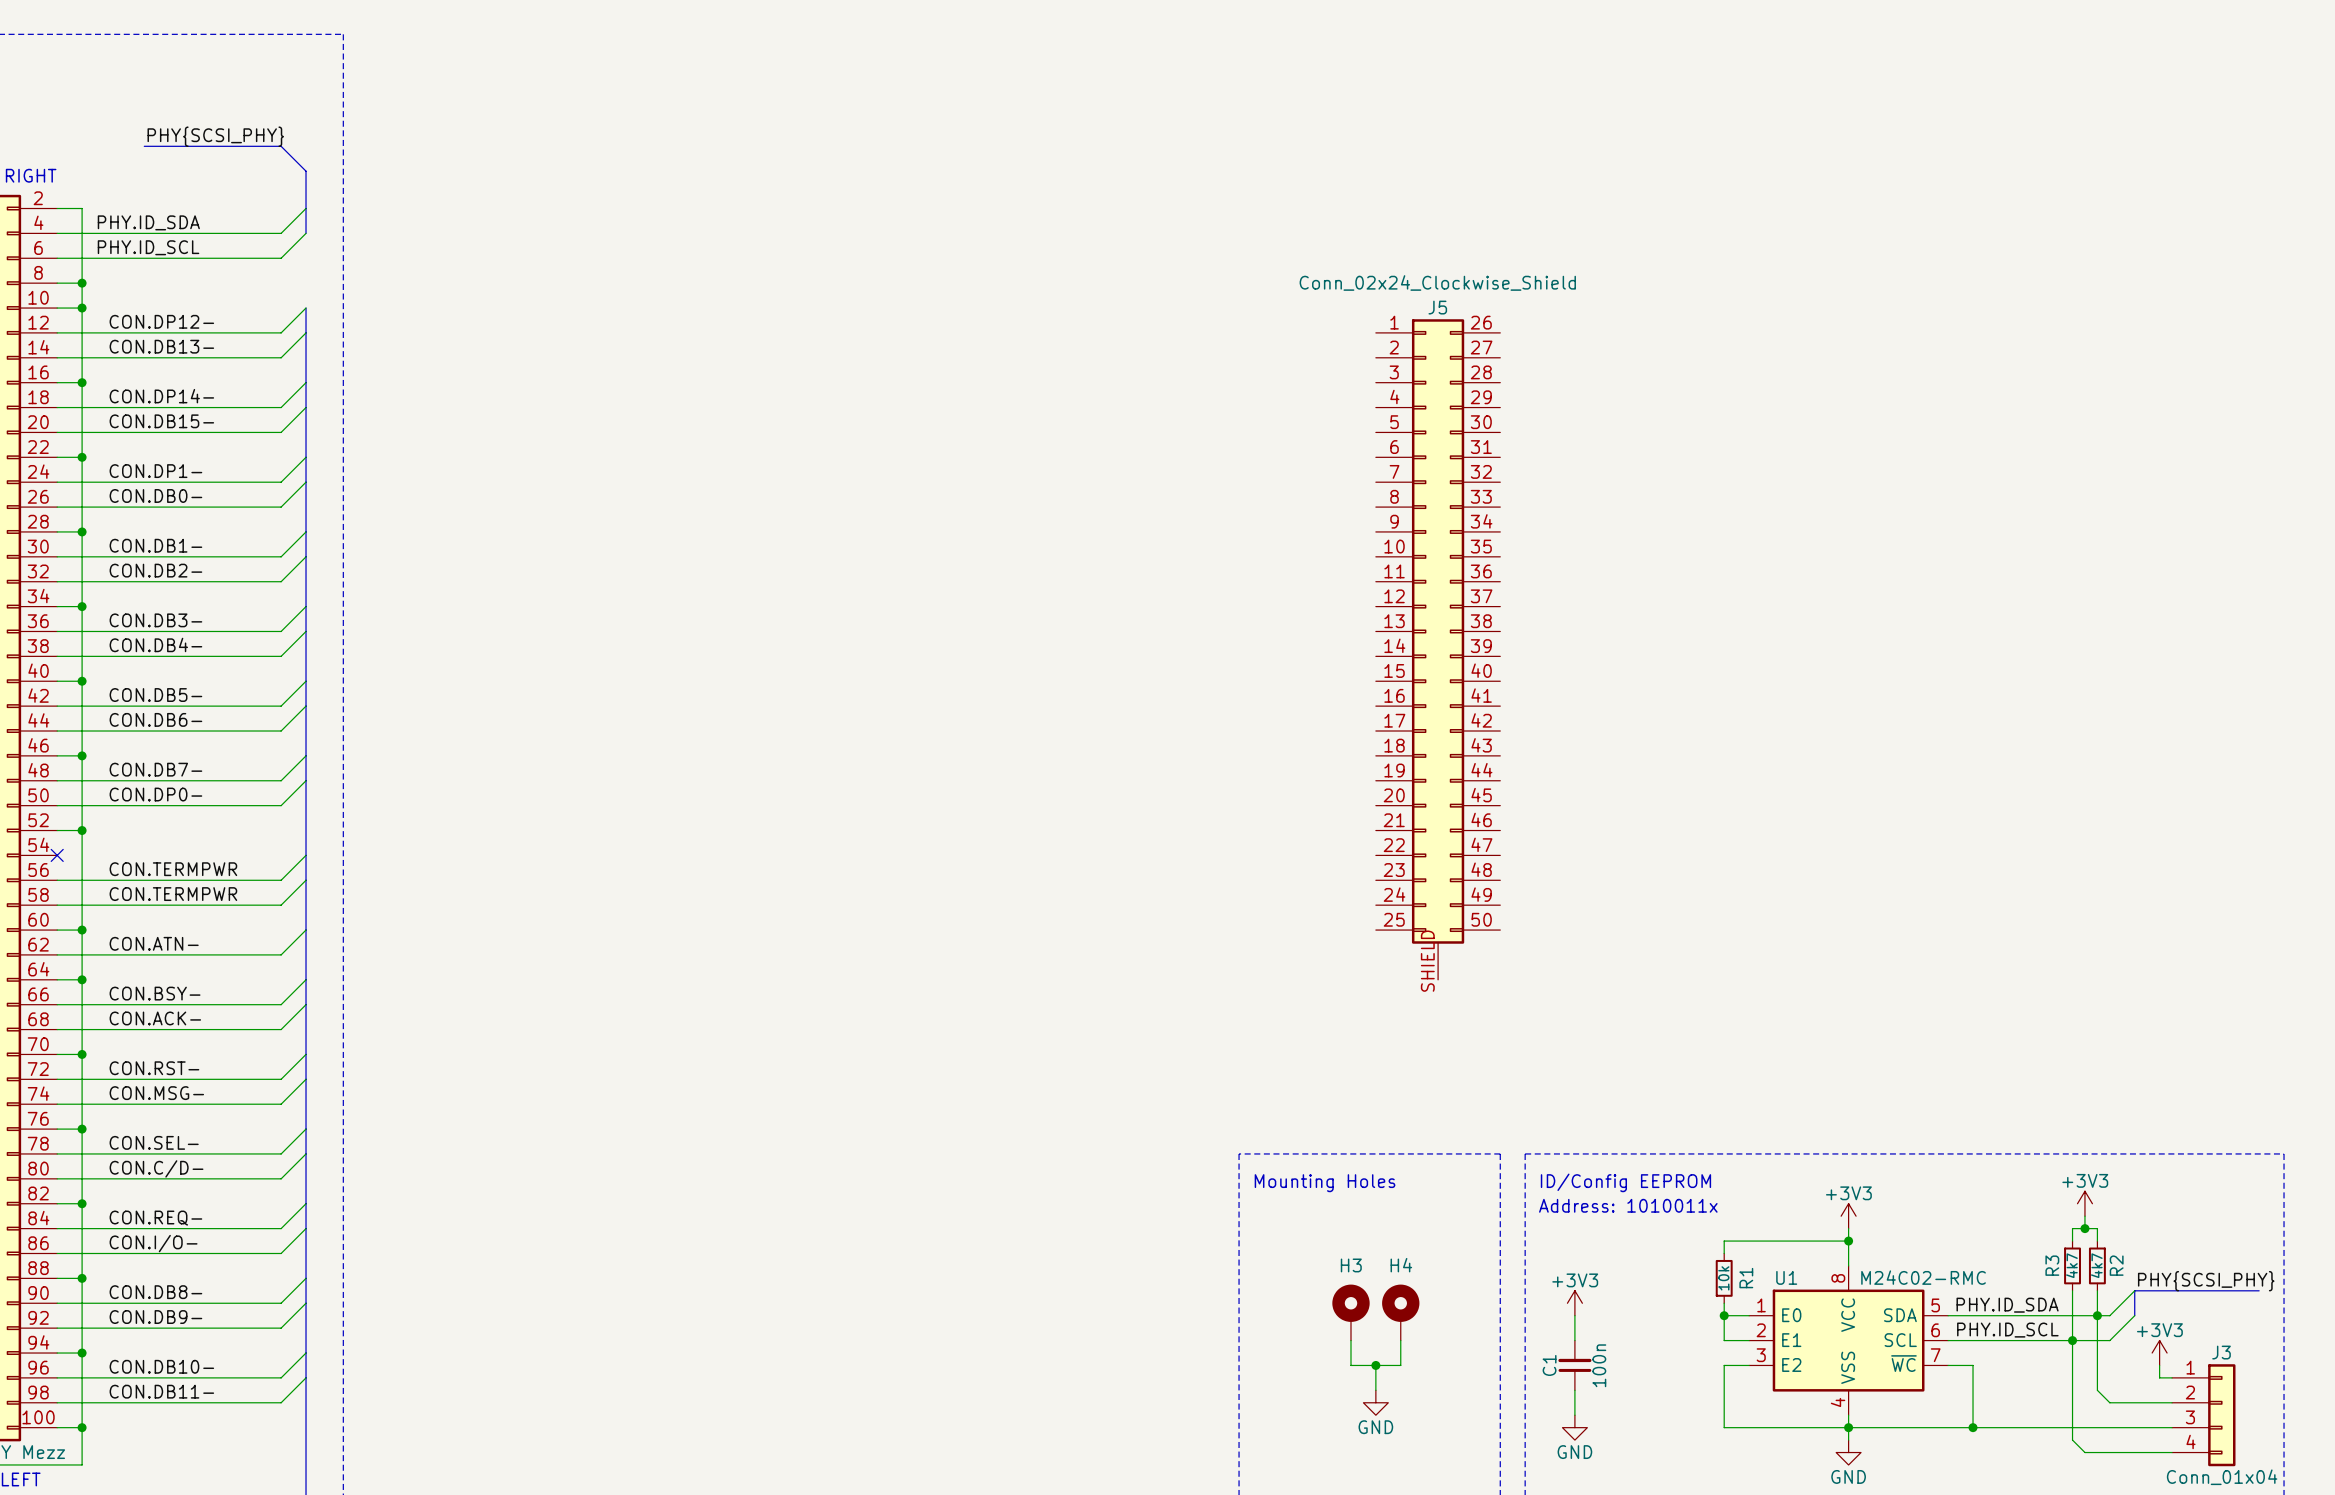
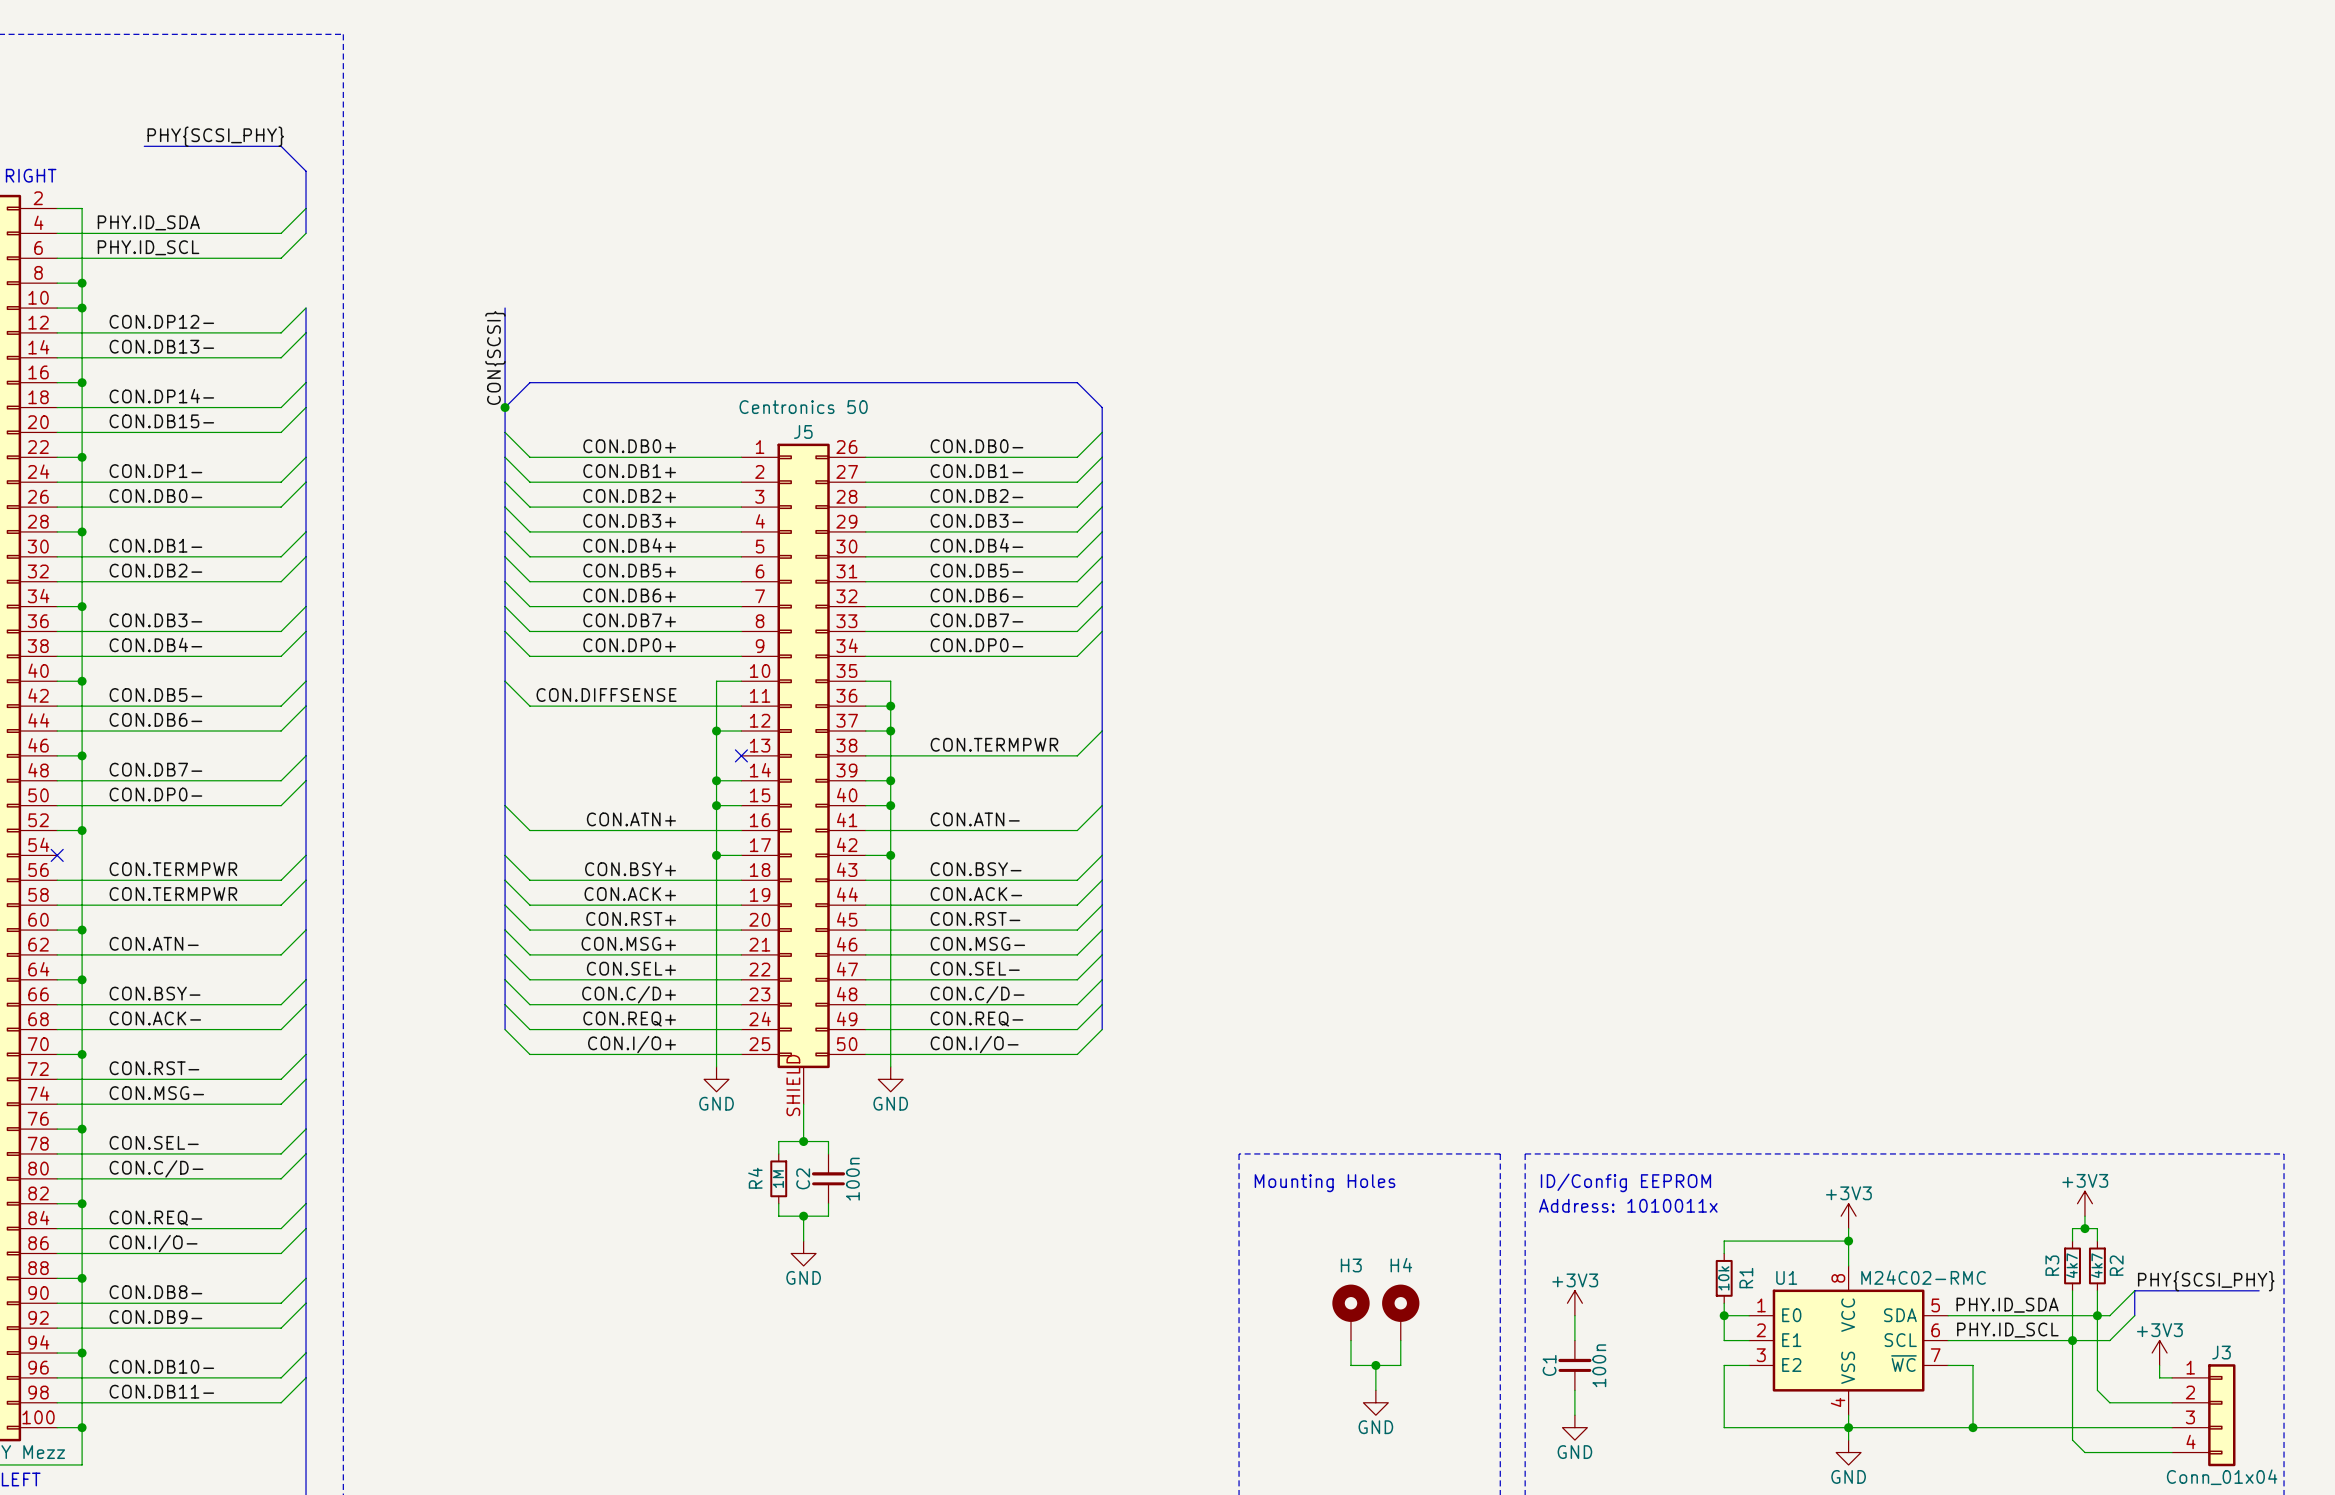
J5 value: Conn_02x24_Clockwise_Shield (1437, 282) -> Centronics 50 (803, 407)
bus: none -> (505, 308) (505, 1029)
label: none -> CON{SCSI} (495, 357)
bus: none -> (505, 407) (529, 382) (1077, 382) (1102, 407) (1102, 1029)
junction: none -> (505, 407)
wire: none -> (505, 432) (529, 457) (741, 457)
wire: none -> (1102, 432) (1077, 457) (865, 457)
label: none -> CON.DB0+ (629, 446)
label: none -> CON.DB0- (976, 446)
wire: none -> (505, 457) (529, 482) (741, 482)
wire: none -> (1102, 457) (1077, 482) (865, 482)
label: none -> CON.DB1+ (629, 471)
label: none -> CON.DB1- (976, 471)
wire: none -> (505, 482) (529, 507) (741, 507)
wire: none -> (1102, 482) (1077, 507) (865, 507)
label: none -> CON.DB2+ (629, 495)
label: none -> CON.DB2- (976, 495)
wire: none -> (505, 507) (529, 531) (741, 531)
wire: none -> (1102, 507) (1077, 531) (865, 531)
label: none -> CON.DB3+ (629, 520)
label: none -> CON.DB3- (976, 520)
wire: none -> (505, 531) (529, 556) (741, 556)
wire: none -> (1102, 531) (1077, 556) (865, 556)
label: none -> CON.DB4+ (629, 545)
label: none -> CON.DB4- (976, 545)
wire: none -> (505, 556) (529, 581) (741, 581)
wire: none -> (1102, 556) (1077, 581) (865, 581)
label: none -> CON.DB5+ (629, 570)
label: none -> CON.DB5- (976, 570)
wire: none -> (505, 581) (529, 606) (741, 606)
wire: none -> (1102, 581) (1077, 606) (865, 606)
label: none -> CON.DB6+ (629, 595)
label: none -> CON.DB6- (976, 595)
wire: none -> (505, 606) (529, 631) (741, 631)
wire: none -> (1102, 606) (1077, 631) (865, 631)
label: none -> CON.DB7+ (629, 620)
label: none -> CON.DB7- (976, 620)
wire: none -> (505, 631) (529, 656) (741, 656)
wire: none -> (1102, 631) (1077, 656) (865, 656)
label: none -> CON.DP0+ (629, 645)
label: none -> CON.DP0- (976, 645)
J5 position: (1438, 649) -> (803, 773)
wire: none -> (505, 681) (529, 706) (741, 706)
wire: none -> (741, 681) (716, 681) (716, 1066)
wire: none -> (865, 681) (890, 681) (890, 1066)
label: none -> CON.DIFFSENSE (606, 695)
wire: none -> (865, 706) (890, 706)
junction: none -> (890, 706)
wire: none -> (716, 731) (741, 731)
junction: none -> (716, 731)
wire: none -> (865, 731) (890, 731)
junction: none -> (890, 731)
wire: none -> (1102, 731) (1077, 755) (865, 755)
label: none -> CON.TERMPWR (994, 744)
no-connect mark: none -> (741, 755)
wire: none -> (716, 780) (741, 780)
junction: none -> (716, 780)
wire: none -> (865, 780) (890, 780)
junction: none -> (890, 780)
wire: none -> (505, 805) (529, 830) (741, 830)
wire: none -> (716, 805) (741, 805)
junction: none -> (716, 805)
wire: none -> (865, 805) (890, 805)
junction: none -> (890, 805)
wire: none -> (1102, 805) (1077, 830) (865, 830)
label: none -> CON.ATN+ (631, 819)
label: none -> CON.ATN- (975, 819)
wire: none -> (505, 855) (529, 880) (741, 880)
wire: none -> (716, 855) (741, 855)
junction: none -> (716, 855)
wire: none -> (865, 855) (890, 855)
junction: none -> (890, 855)
wire: none -> (1102, 855) (1077, 880) (865, 880)
label: none -> CON.BSY+ (630, 869)
label: none -> CON.BSY- (976, 869)
wire: none -> (505, 880) (529, 905) (741, 905)
wire: none -> (1102, 880) (1077, 905) (865, 905)
label: none -> CON.ACK+ (630, 894)
label: none -> CON.ACK- (976, 894)
wire: none -> (505, 905) (529, 930) (741, 930)
wire: none -> (1102, 905) (1077, 930) (865, 930)
label: none -> CON.RST+ (631, 918)
label: none -> CON.RST- (975, 918)
wire: none -> (505, 930) (529, 954) (741, 954)
wire: none -> (1102, 930) (1077, 954) (865, 954)
label: none -> CON.MSG+ (628, 943)
label: none -> CON.MSG- (977, 943)
wire: none -> (505, 954) (529, 979) (741, 979)
wire: none -> (1102, 954) (1077, 979) (865, 979)
label: none -> CON.SEL+ (631, 968)
label: none -> CON.SEL- (975, 968)
wire: none -> (505, 979) (529, 1004) (741, 1004)
wire: none -> (1102, 979) (1077, 1004) (865, 1004)
label: none -> CON.C/D+ (629, 994)
label: none -> CON.C/D- (977, 994)
wire: none -> (505, 1004) (529, 1029) (741, 1029)
wire: none -> (1102, 1004) (1077, 1029) (865, 1029)
label: none -> CON.REQ+ (629, 1019)
label: none -> CON.REQ- (976, 1019)
wire: none -> (505, 1029) (529, 1054) (741, 1054)
wire: none -> (1102, 1029) (1077, 1054) (865, 1054)
label: none -> CON.I/O+ (632, 1044)
label: none -> CON.I/O- (974, 1044)
power symbol: none -> GND (716, 1079)
power symbol: none -> GND (890, 1079)
wire: none -> (803, 1104) (803, 1141)
junction: none -> (803, 1141)
wire: none -> (778, 1153) (778, 1141) (828, 1141) (828, 1153)
R4: none -> 1M (778, 1178)
C2: none -> 100n (828, 1178)
wire: none -> (778, 1203) (778, 1216) (828, 1216) (828, 1203)
wire: none -> (803, 1216) (803, 1241)
junction: none -> (803, 1216)
power symbol: none -> GND (803, 1253)

